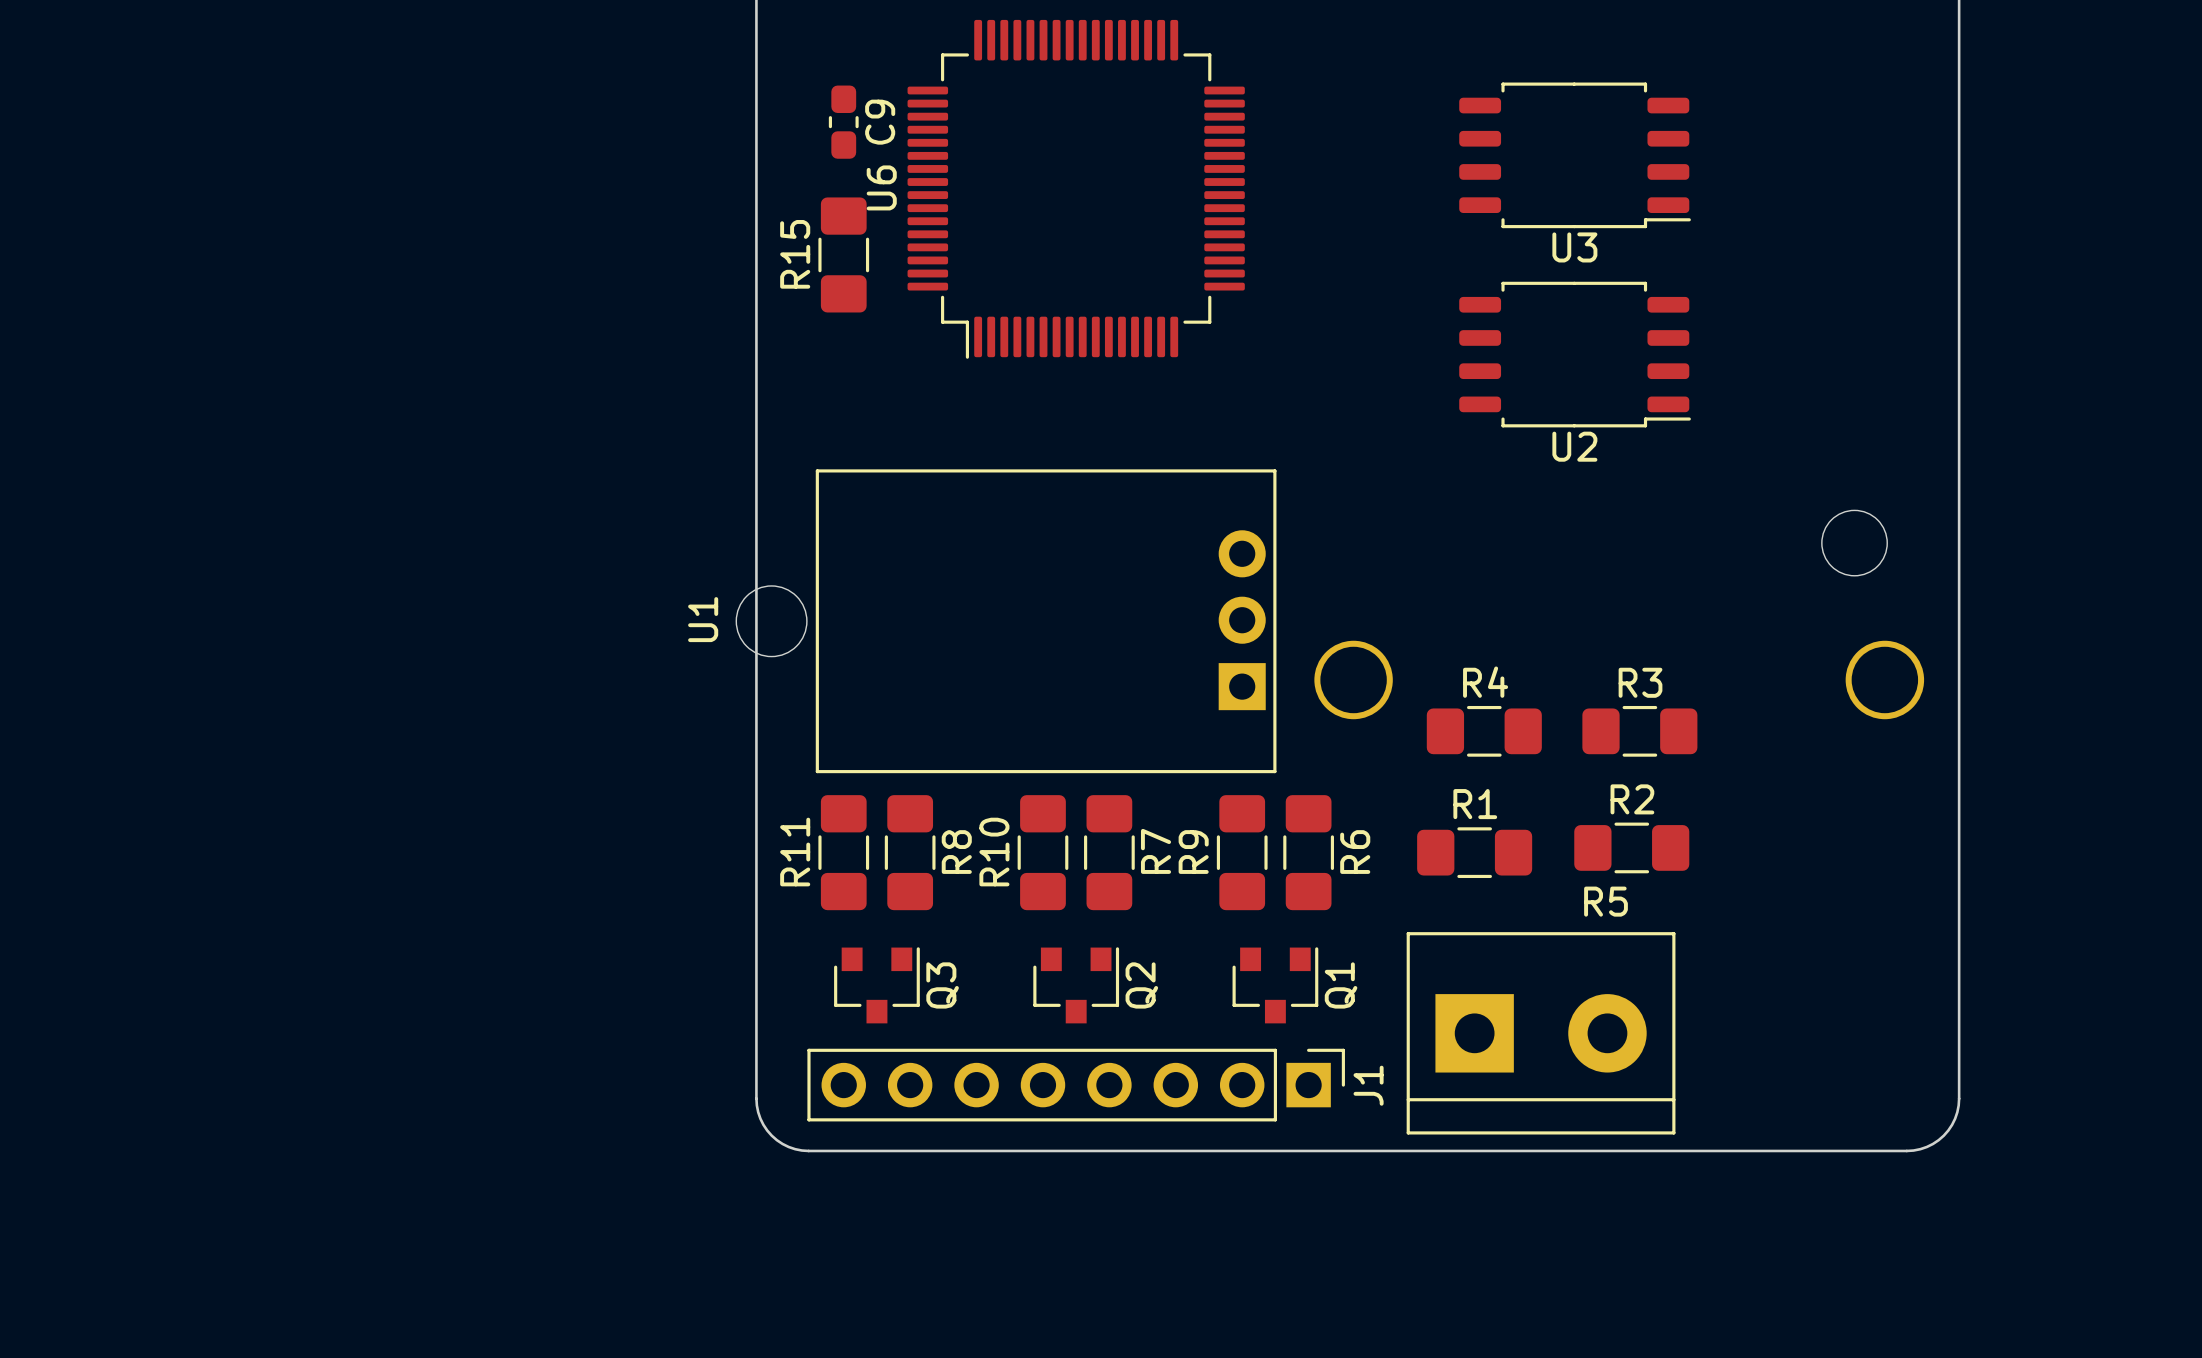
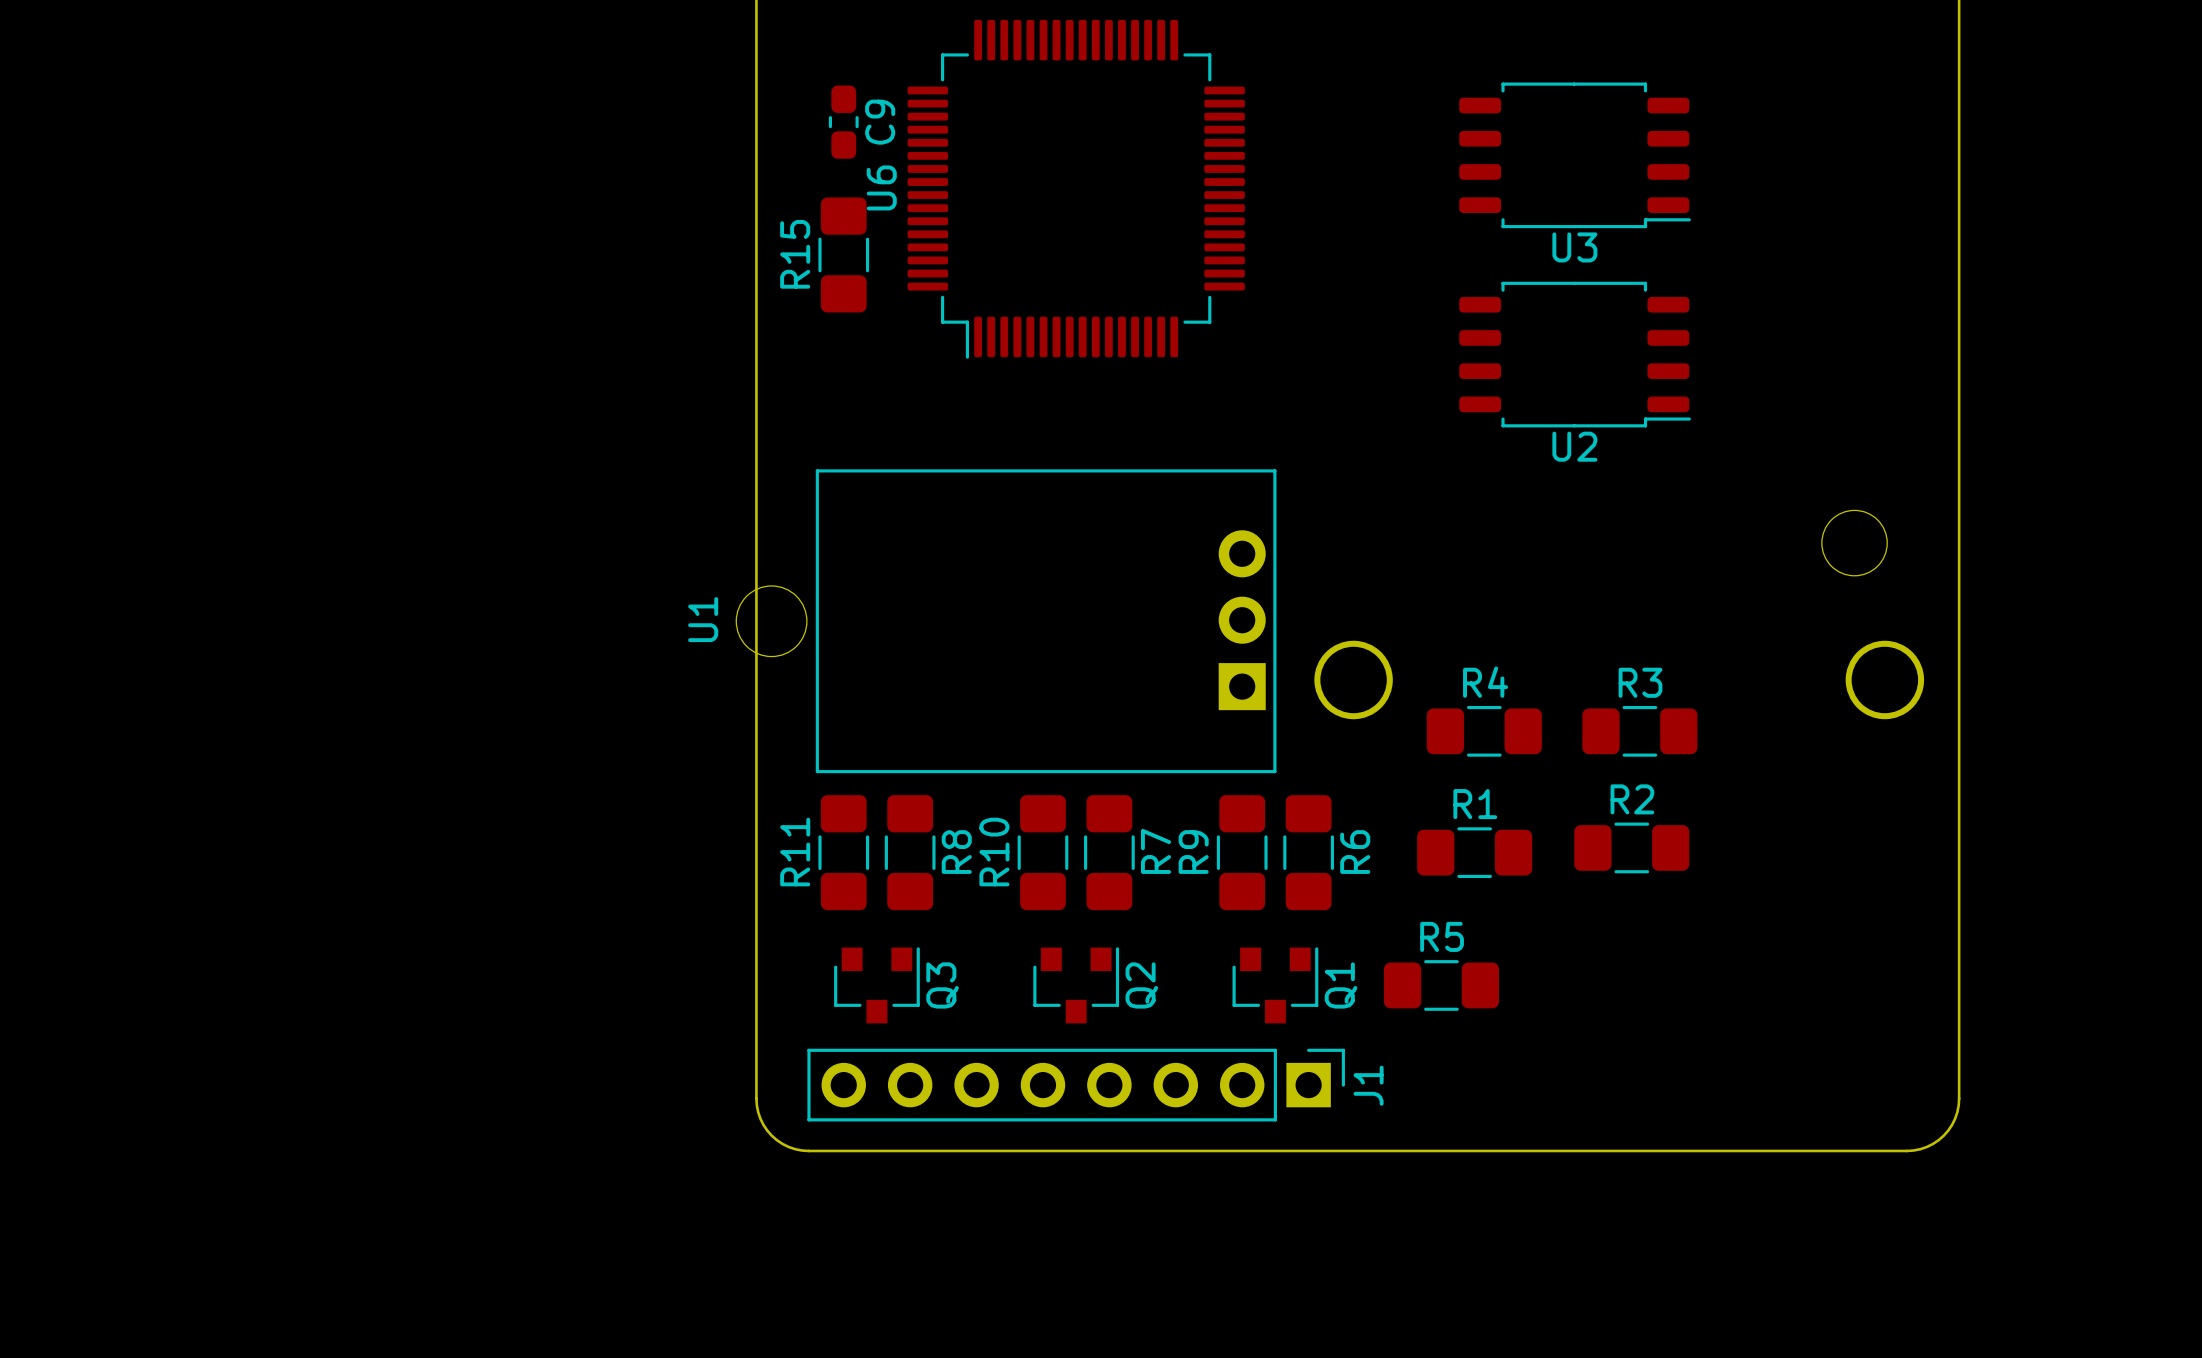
R5 name position: R5 (1606, 901) -> R5 (1442, 936)
R5 footprint: [1406, 932, 1676, 1135] -> [1383, 960, 1499, 1011]

